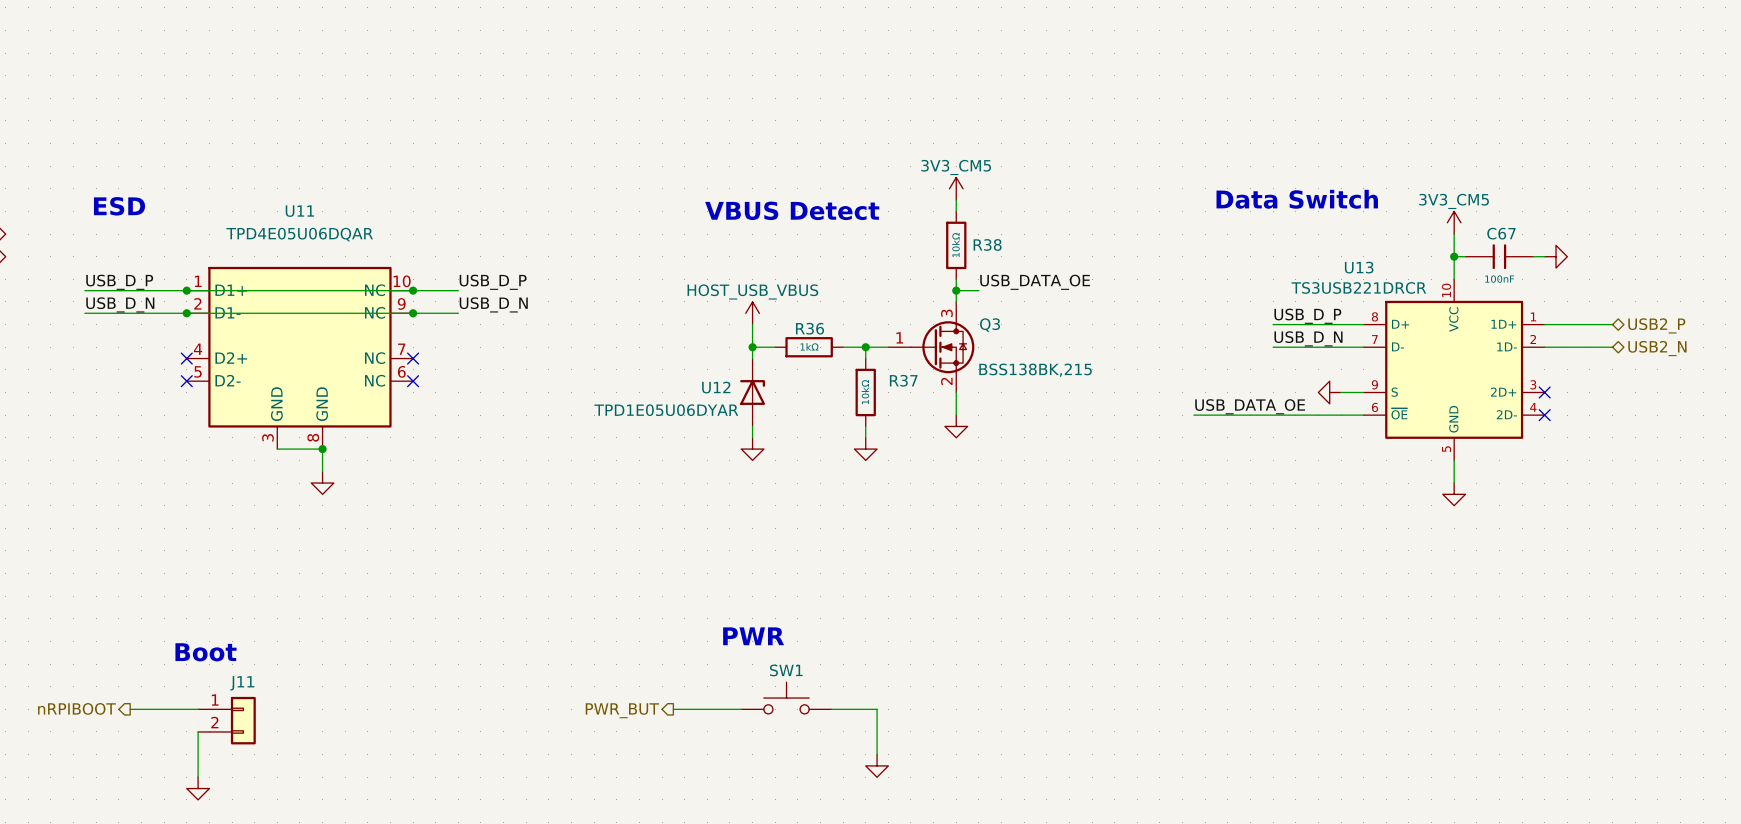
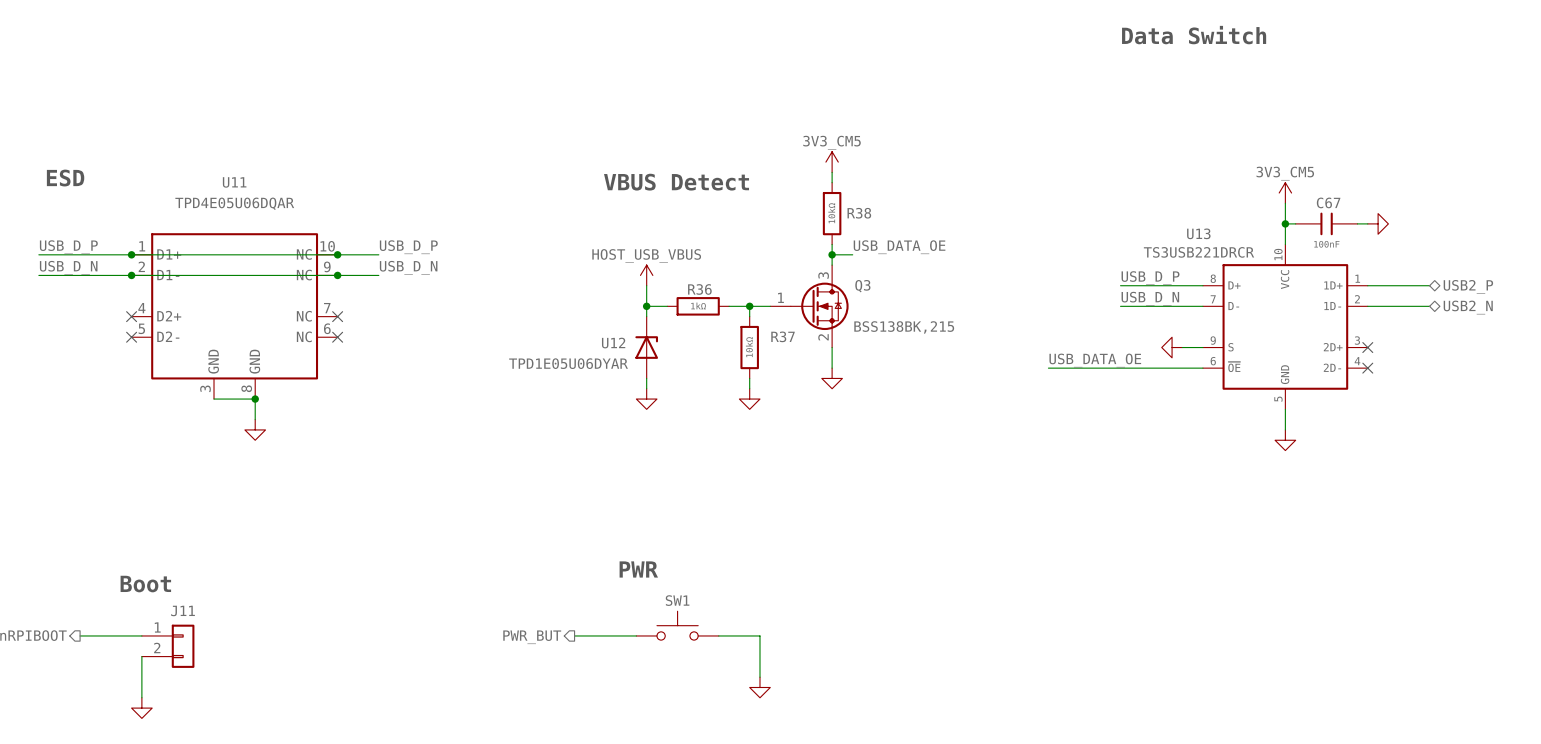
text position: Data Switch (1297, 199) -> Data Switch (1194, 35)

